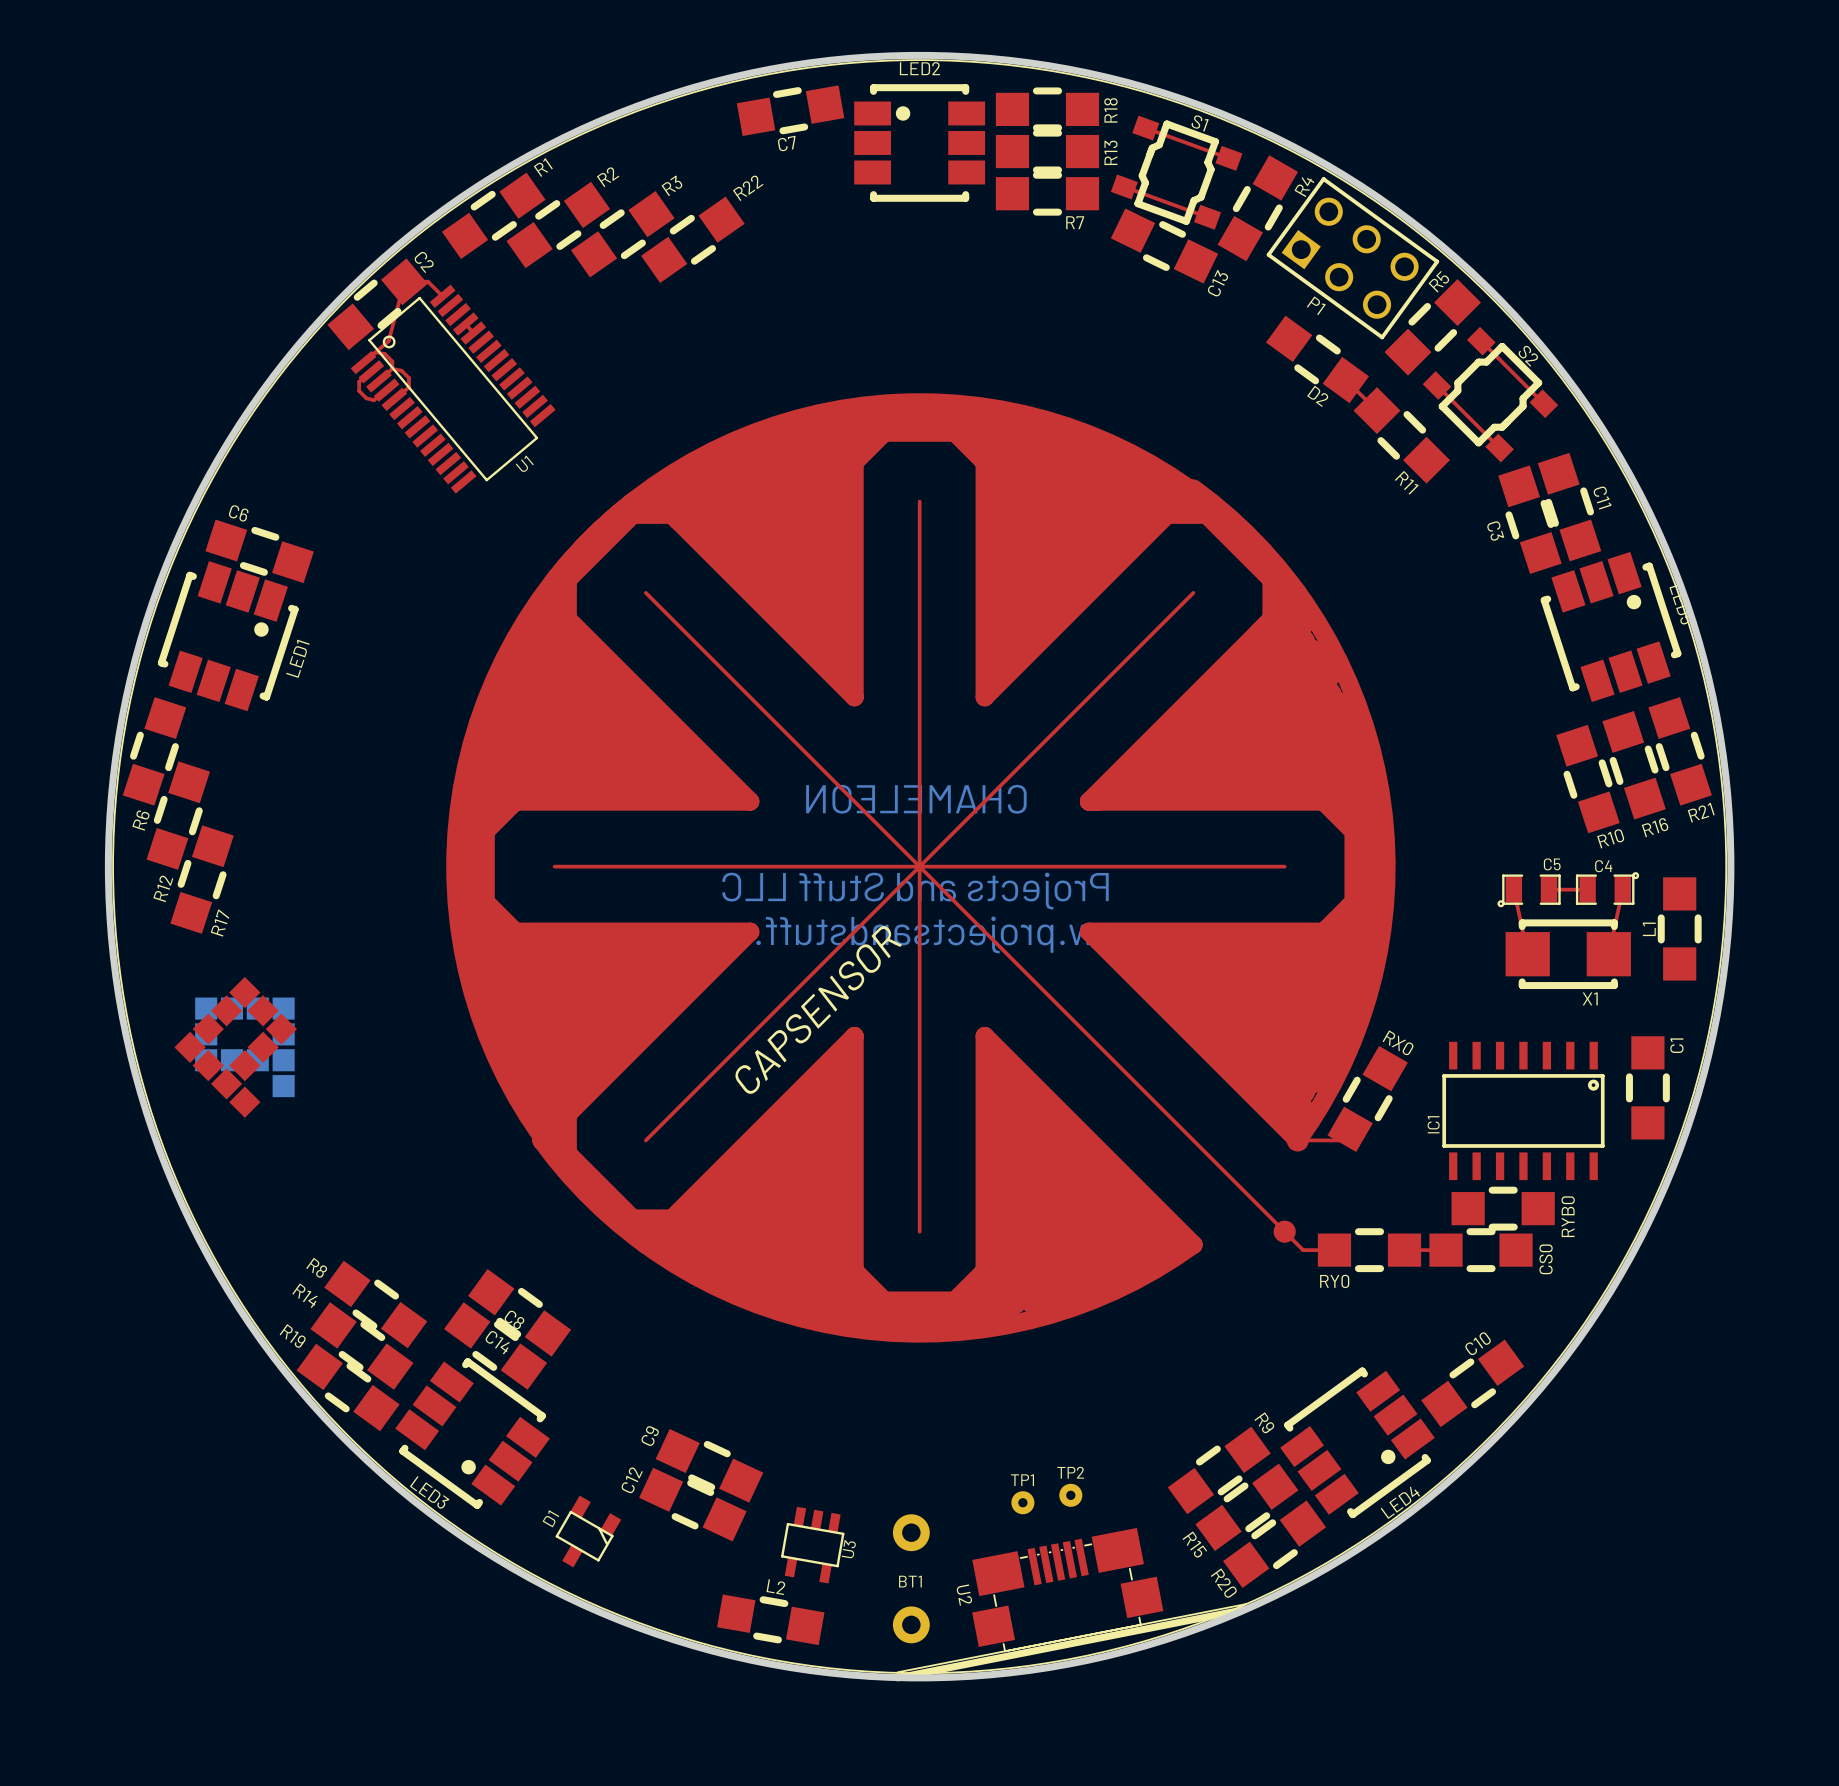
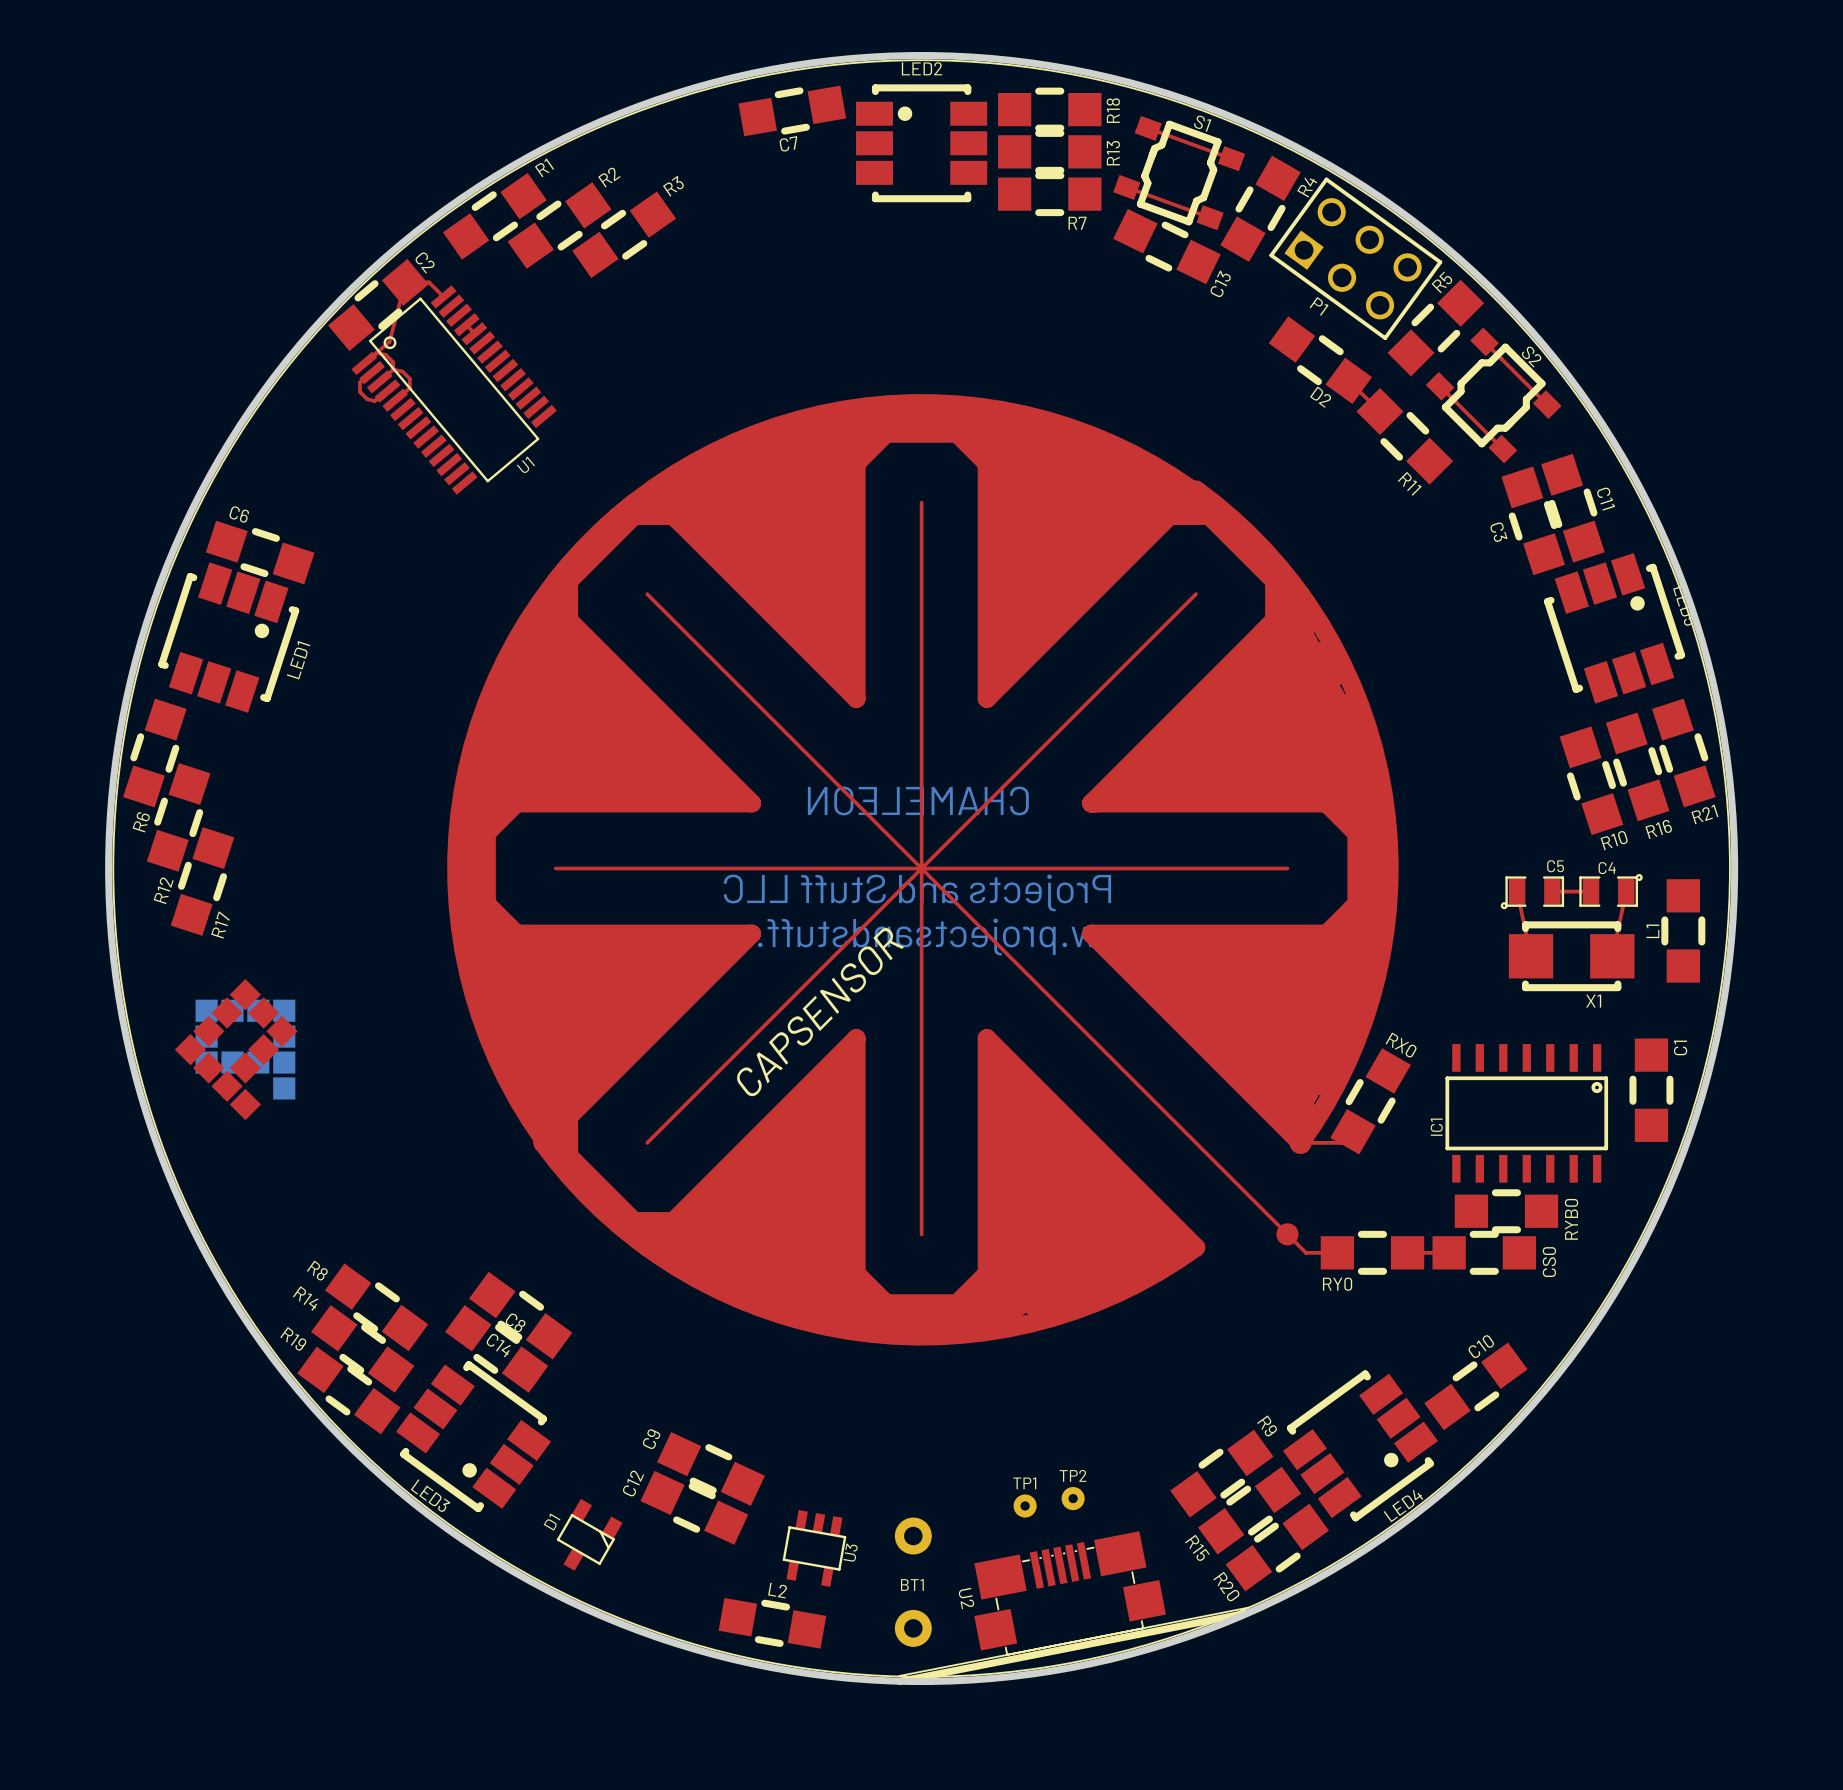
R22: (692, 239) -> none

